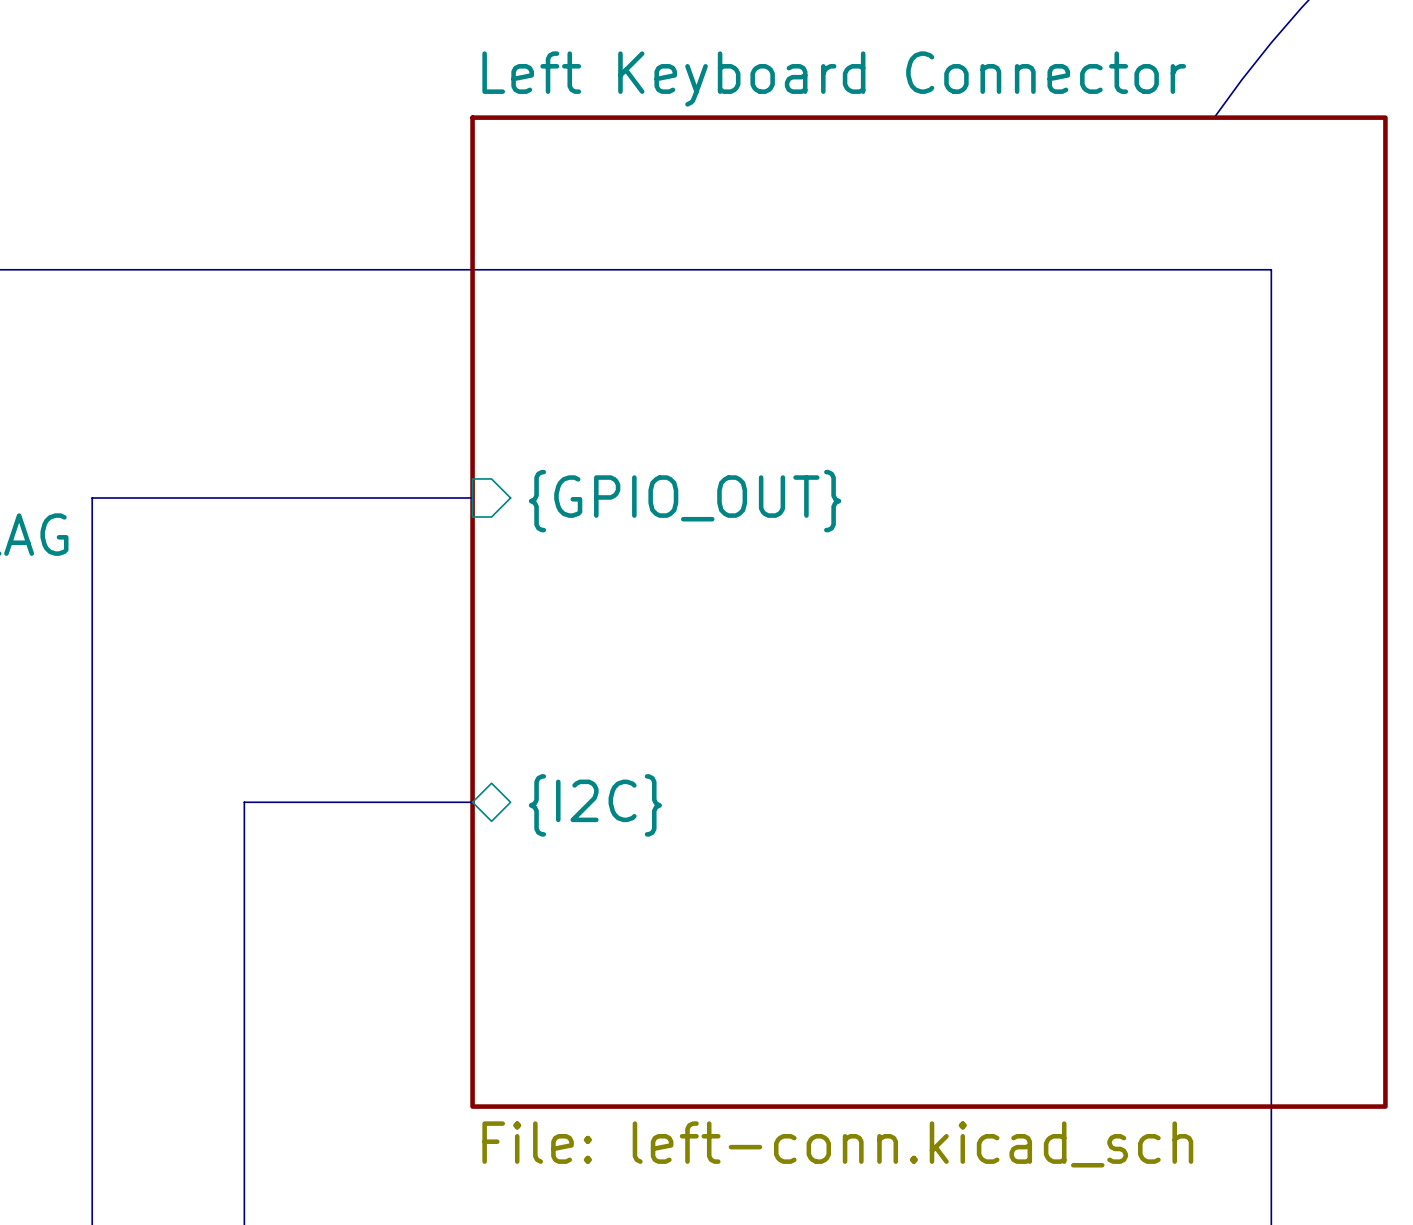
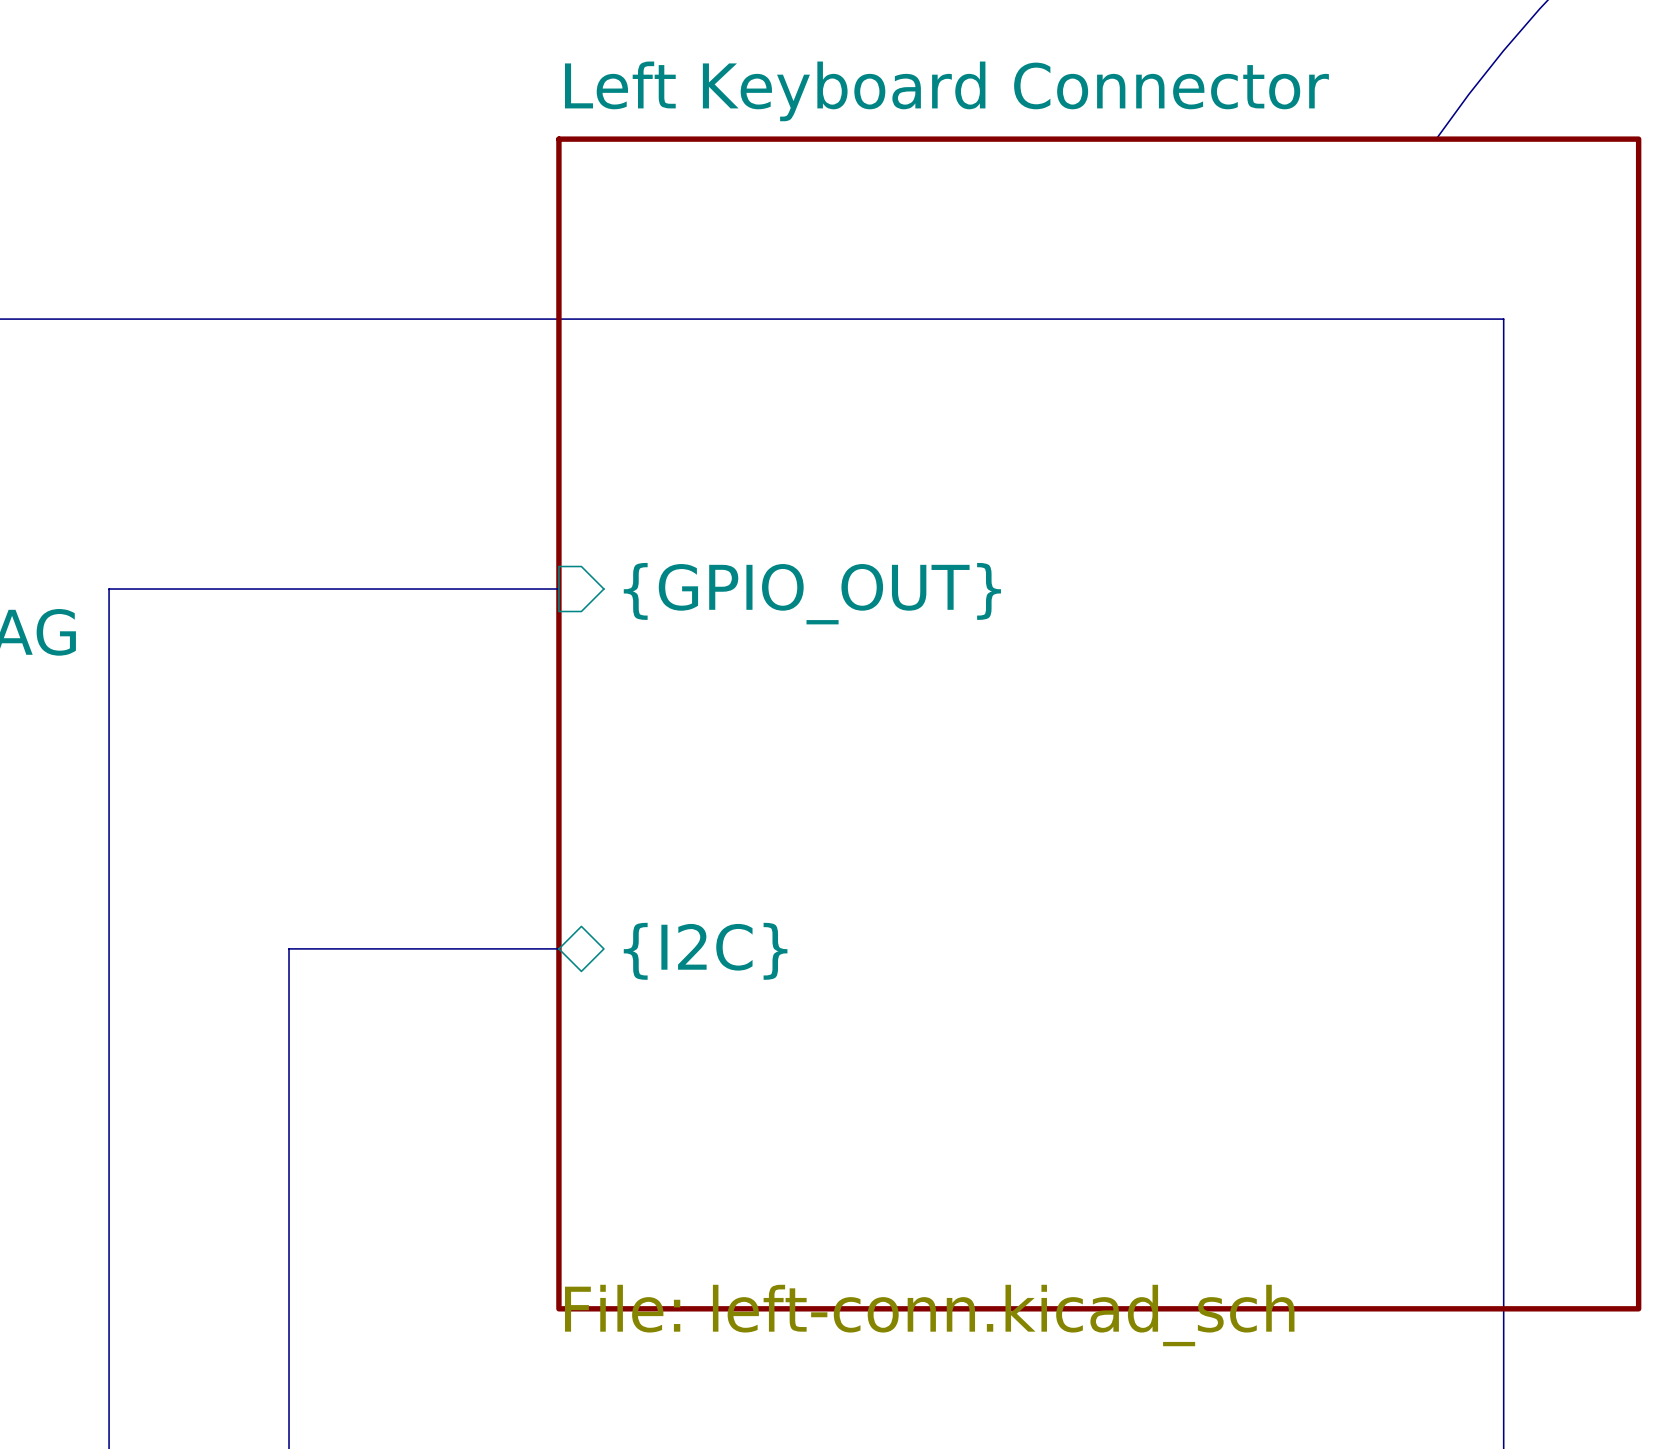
sheet Left Keyboard Connector value position: File: left-conn.kicad_sch (837, 1144) -> File: left-conn.kicad_sch (929, 1315)

